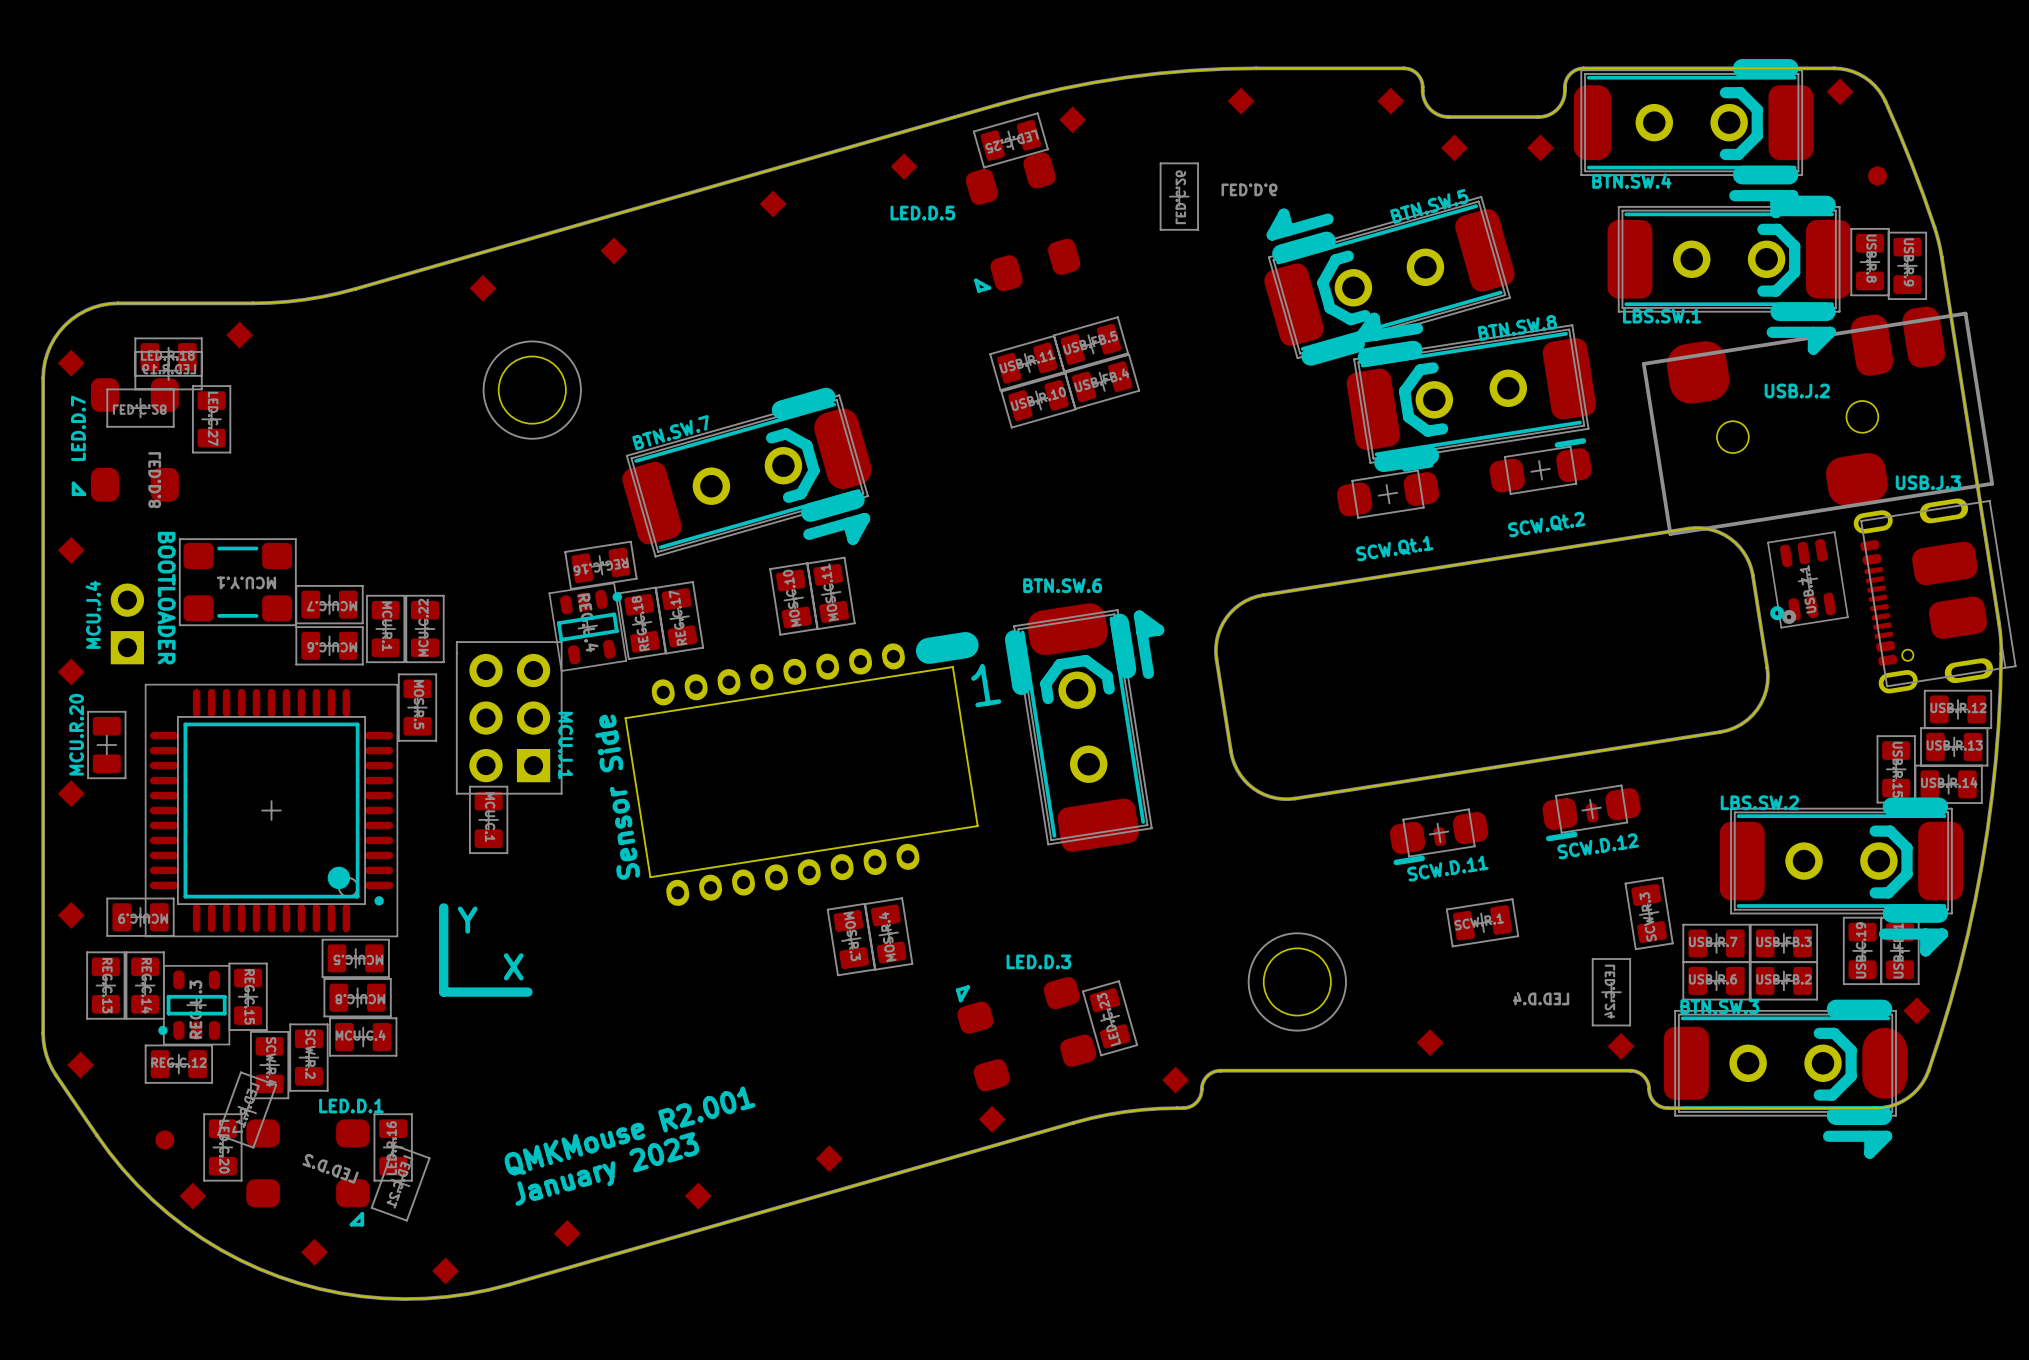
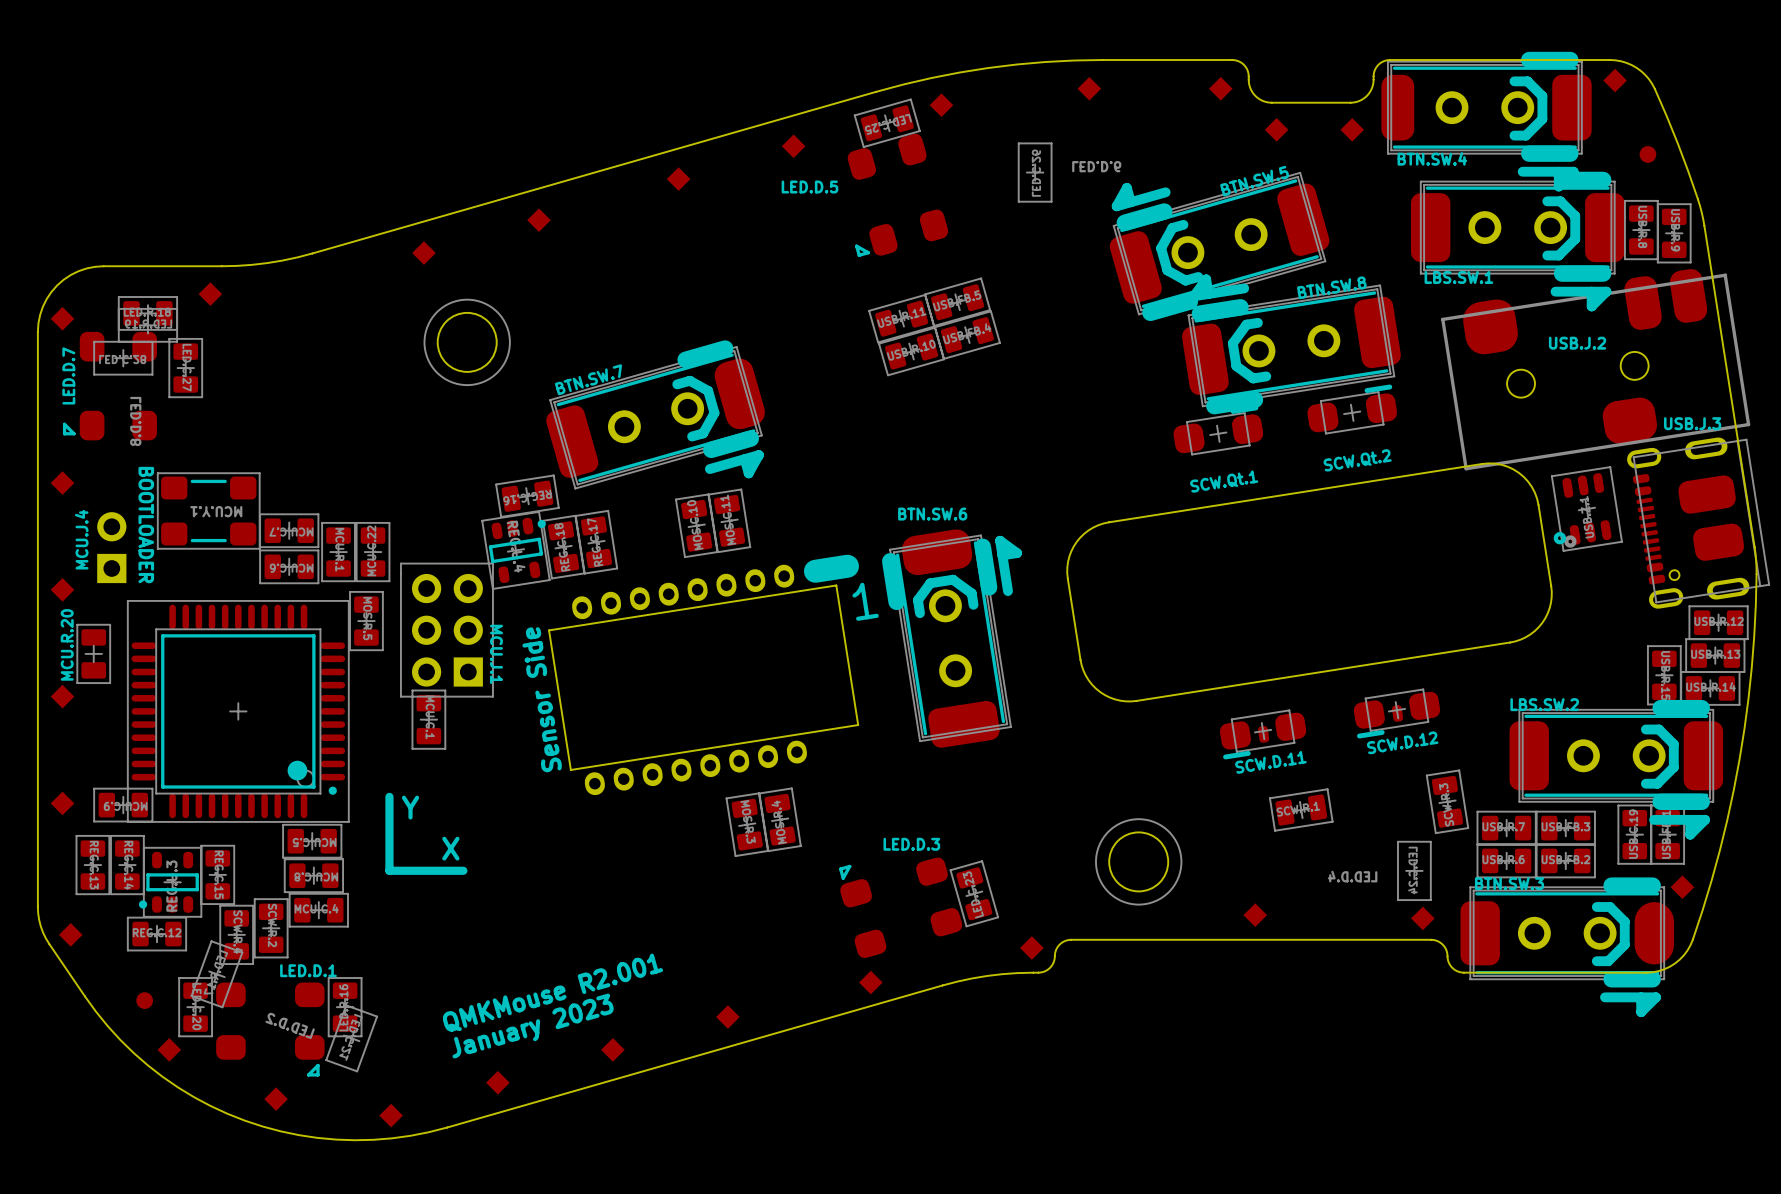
line: (1256, 68) (1408, 69) (1420, 77) (1423, 96) (1428, 107) (1437, 114) (1448, 117) (1538, 117) (1548, 115) (1561, 103) (1565, 82) (1569, 75) (1575, 70) (1583, 68) (1840, 68) (1864, 77) (1882, 95) (1911, 163) (1934, 227) (1940, 249) (2001, 646) (1995, 760) (1987, 830) (1975, 900) (1959, 968) (1939, 1036) (1926, 1076) (1913, 1093) (1896, 1104) (1875, 1108) (1667, 1108) (1654, 1102) (1650, 1096) (1646, 1079) (1640, 1073) (1632, 1070) (1218, 1070) (1205, 1078) (1198, 1099) (1187, 1107) (1142, 1109) (1090, 1118) (509, 1284) (467, 1293) (425, 1298) (383, 1298) (340, 1293) (299, 1283) (259, 1268) (221, 1249) (185, 1226) (137, 1184) (109, 1152) (56, 1075) (49, 1062) (43, 1040) (43, 378) (45, 361) (50, 345) (65, 325) (85, 310) (109, 303) (270, 302) (304, 299) (338, 293) (1029, 96) (1125, 77) (1190, 70) (1256, 68) -> none
line: (1688, 528) (1263, 595) (1245, 601) (1230, 612) (1223, 622) (1216, 646) (1231, 751) (1236, 769) (1248, 784) (1258, 791) (1276, 798) (1288, 799) (1720, 732) (1741, 724) (1757, 709) (1764, 696) (1767, 682) (1767, 667) (1751, 569) (1743, 552) (1725, 535) (1707, 528) (1688, 528) -> none

